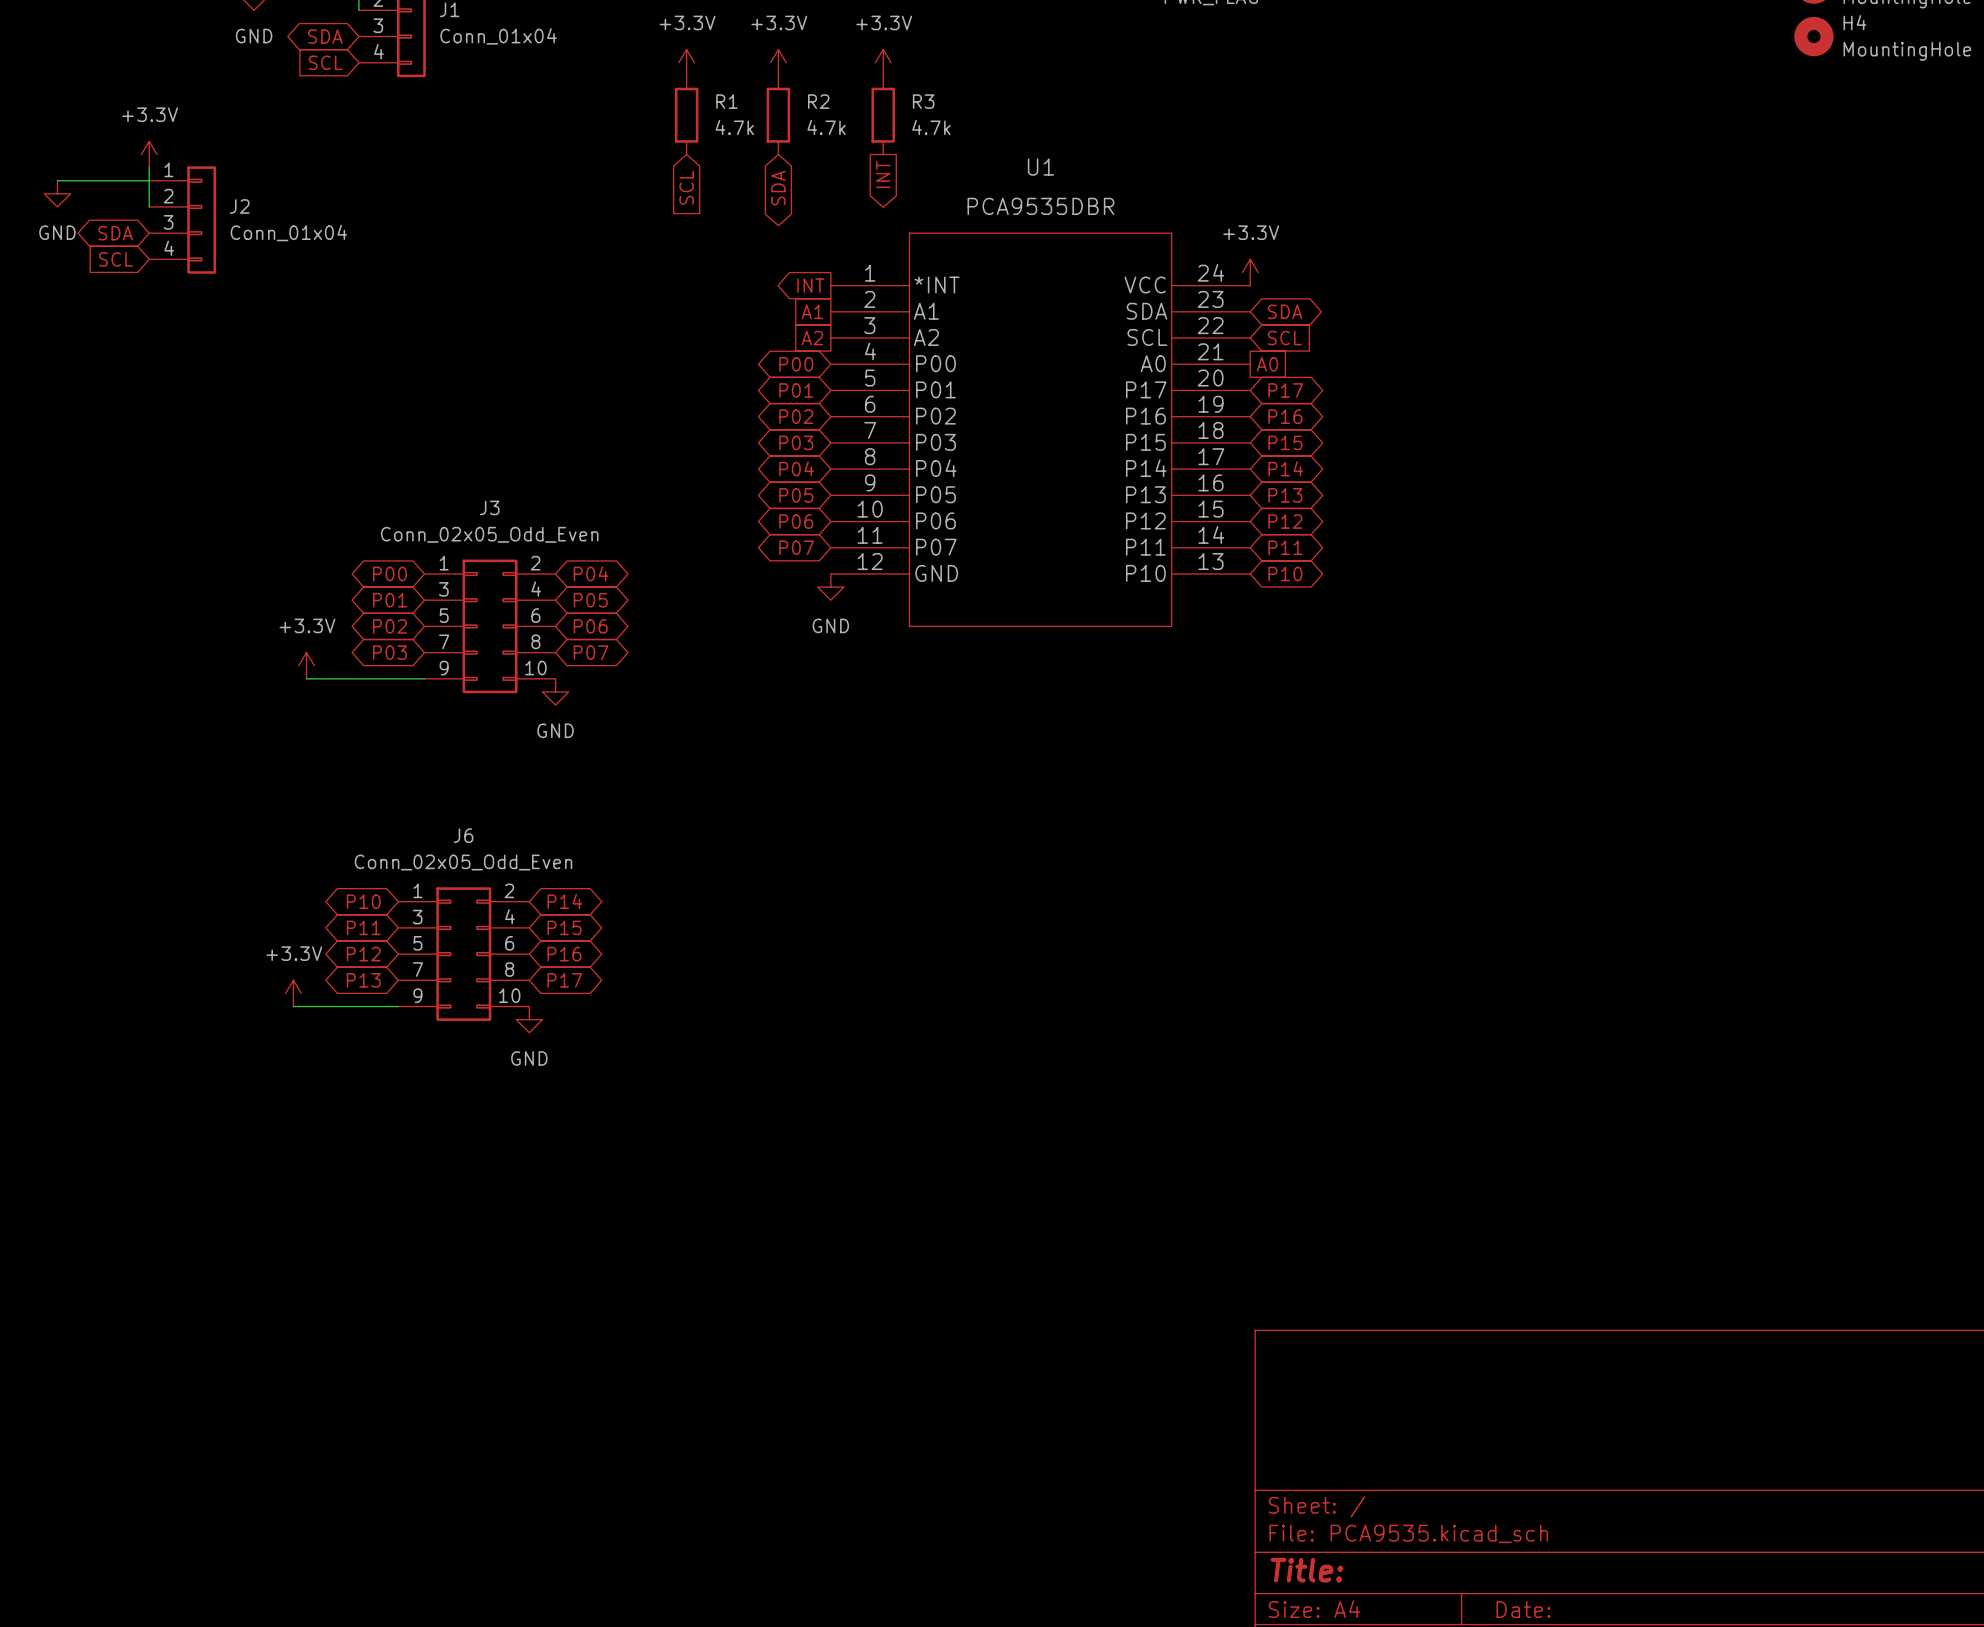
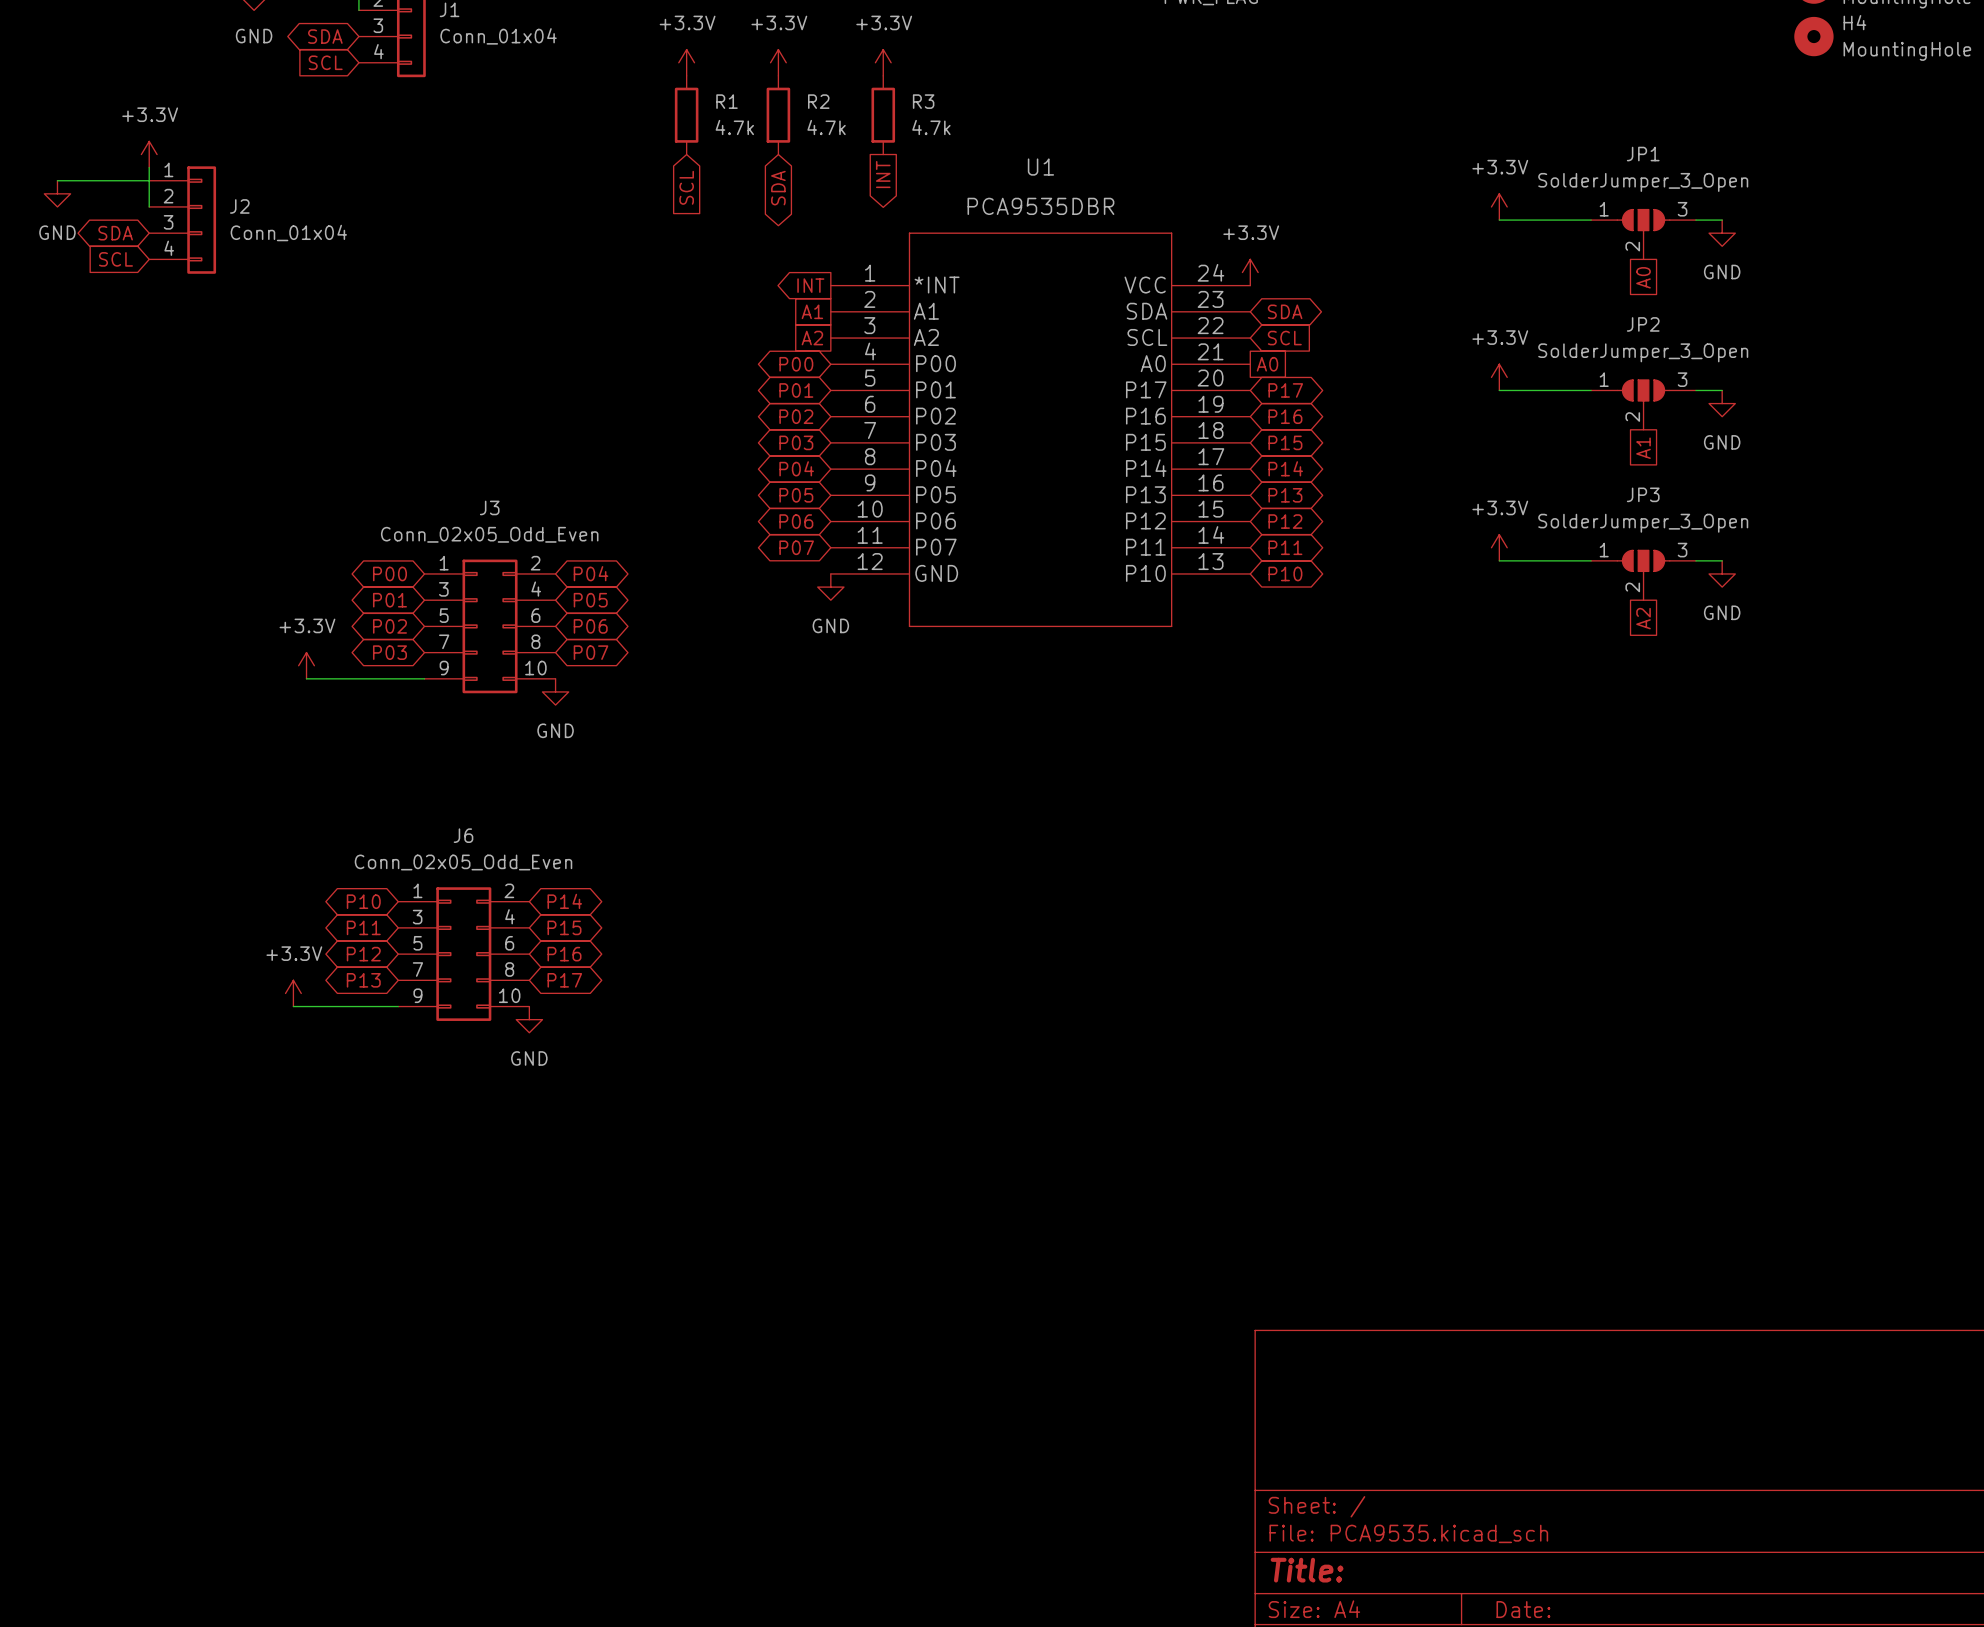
power symbol: none -> +3.3V (1499, 206)
wire: none -> (1499, 220) (1591, 220)
wire: none -> (1695, 220) (1722, 220)
power symbol: none -> GND (1722, 233)
JP1: none -> SolderJumper_3_Open (1643, 234)
global label: none -> A0 (1643, 277)
power symbol: none -> +3.3V (1499, 377)
wire: none -> (1499, 390) (1591, 390)
wire: none -> (1695, 390) (1722, 390)
power symbol: none -> GND (1722, 403)
JP2: none -> SolderJumper_3_Open (1643, 404)
global label: none -> A1 (1643, 448)
power symbol: none -> +3.3V (1499, 547)
wire: none -> (1499, 560) (1591, 560)
wire: none -> (1695, 560) (1722, 560)
power symbol: none -> GND (1722, 573)
JP3: none -> SolderJumper_3_Open (1643, 575)
global label: none -> A2 (1643, 618)

